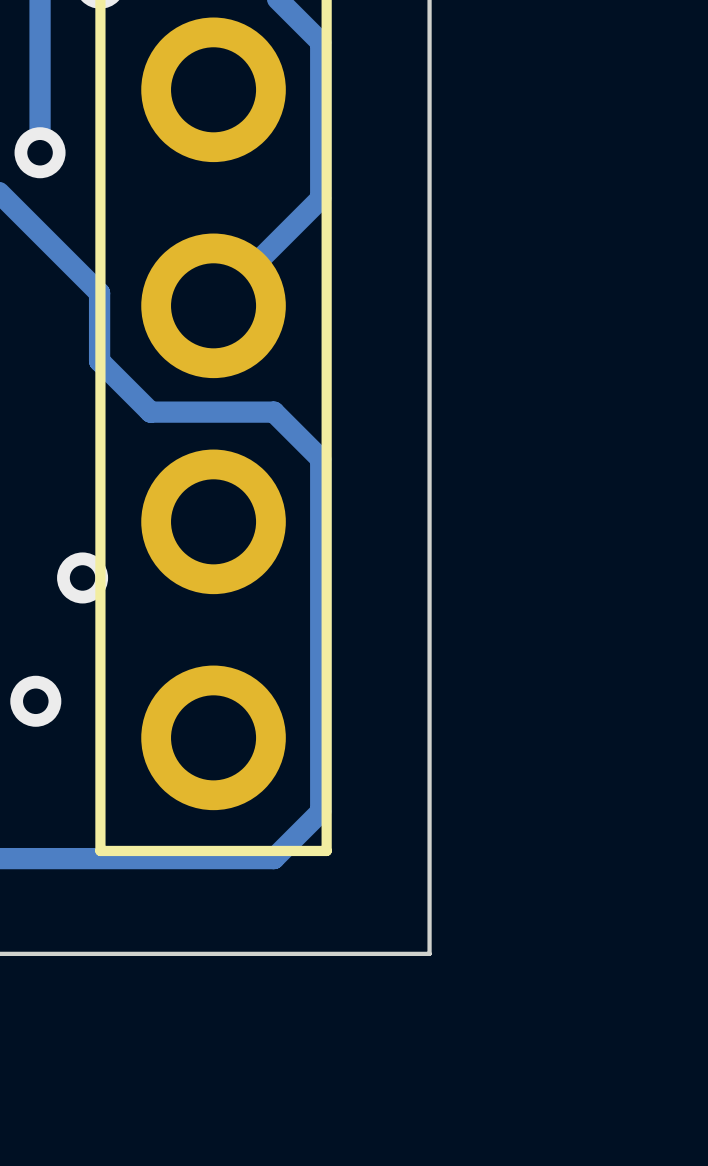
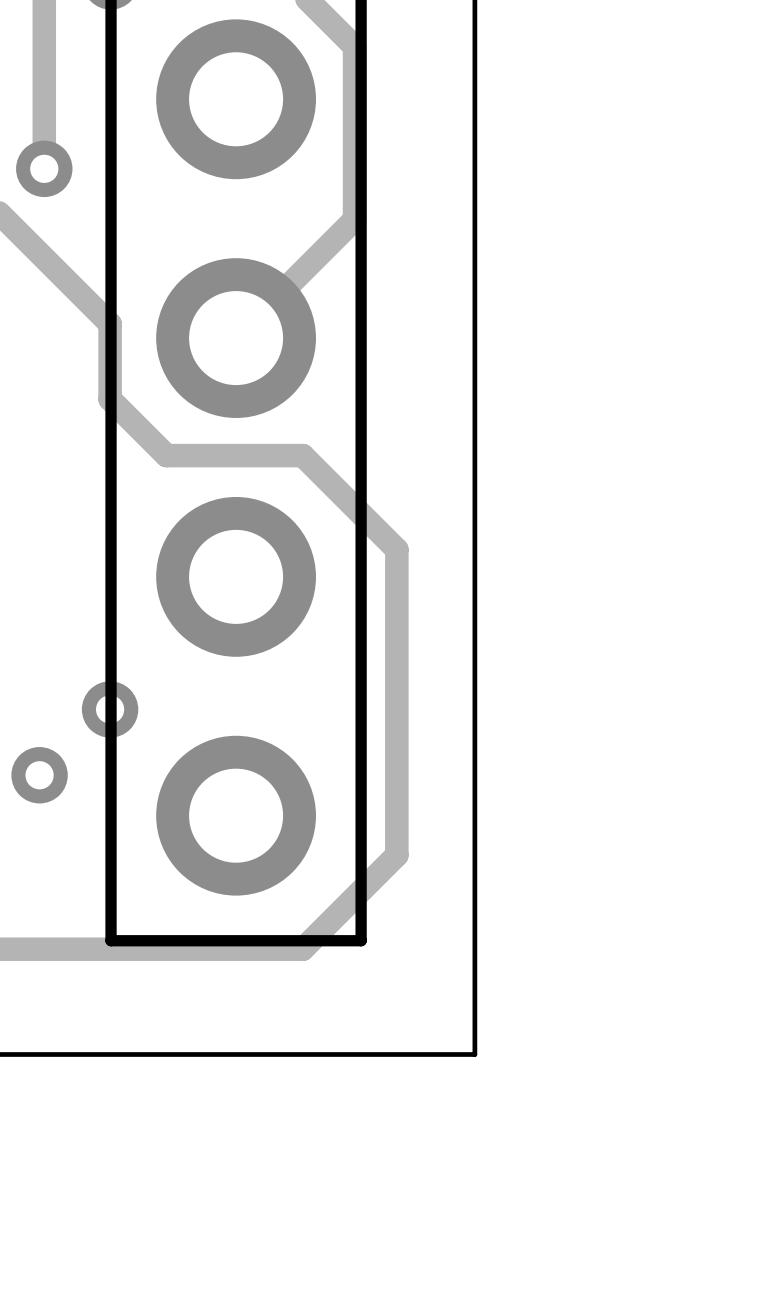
track: (320, 458) (320, 811) -> (354, 507) (396, 549) (396, 855) (354, 897)
via position: (82, 577) -> (110, 709)

